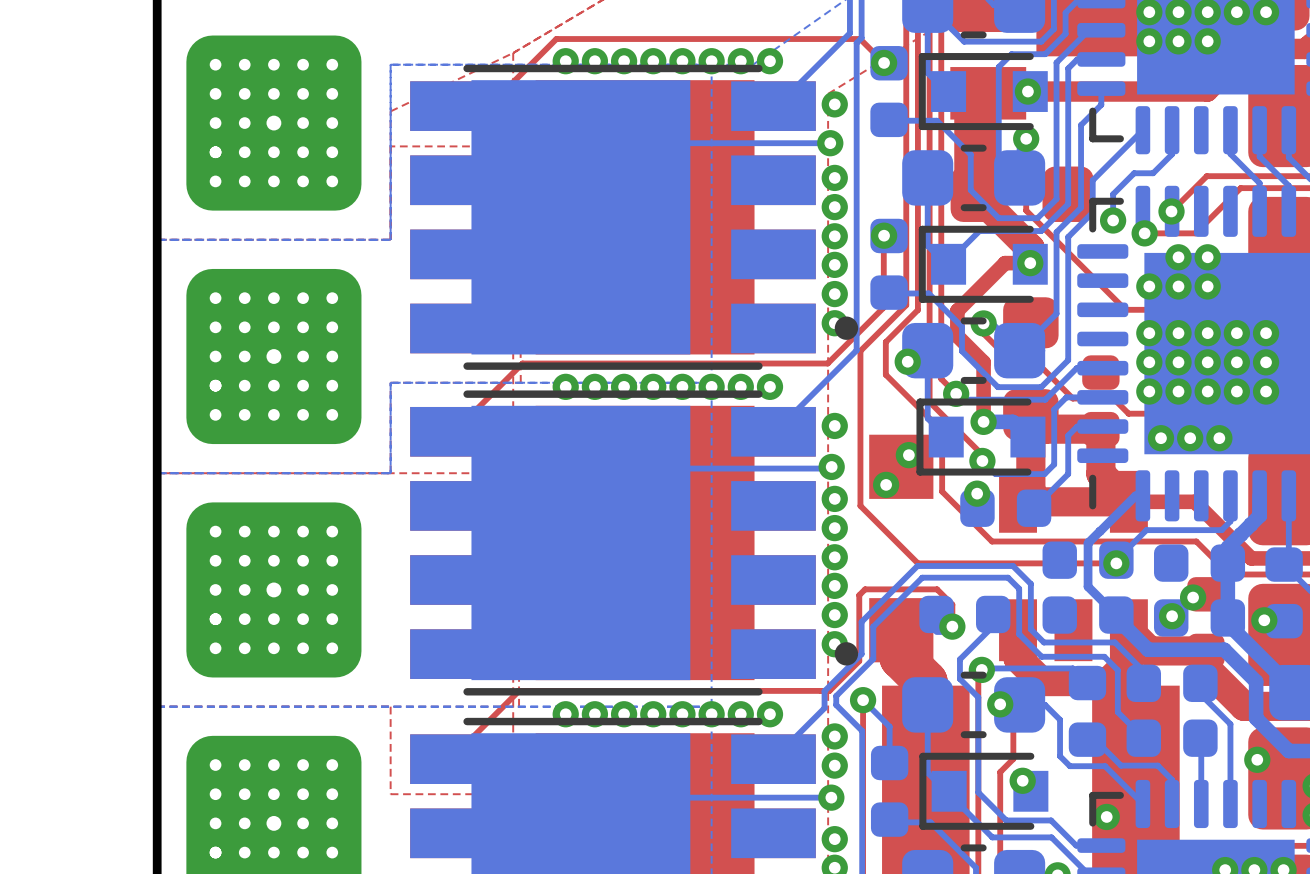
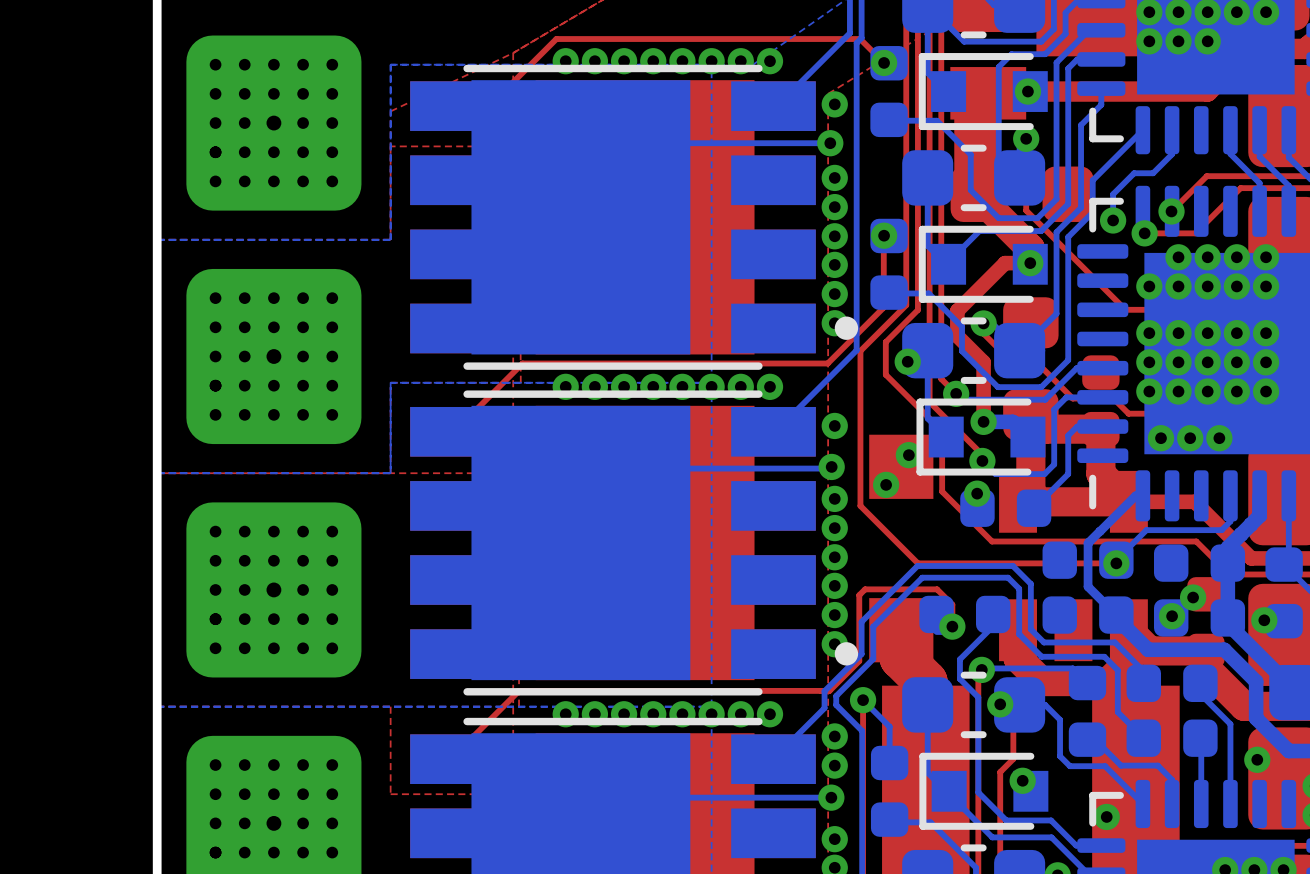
via: none -> (1236, 257)
via: none -> (1266, 257)
via: none -> (1236, 286)
via: none -> (1266, 286)

